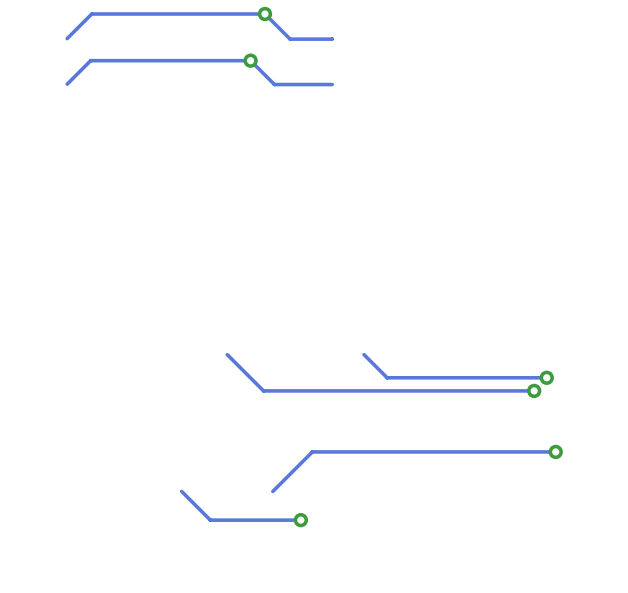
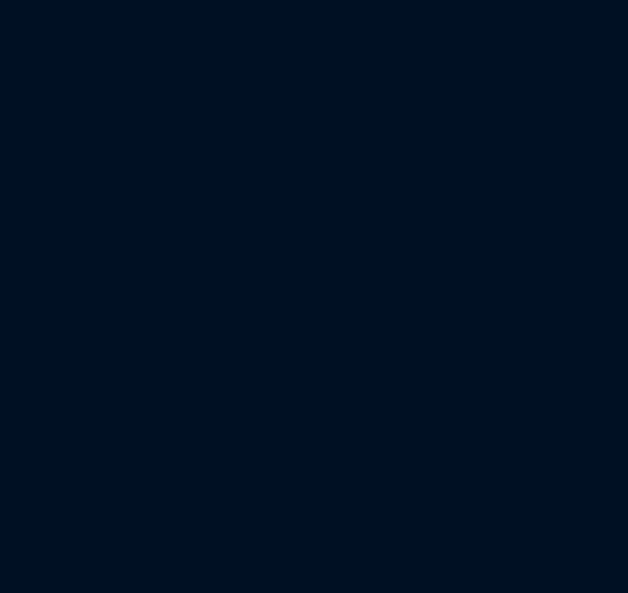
via: (264, 14) -> none
track: (67, 38) (91, 14) (264, 14) (290, 39) (332, 39) -> none
via: (250, 60) -> none
track: (67, 84) (90, 60) (250, 60) (274, 84) (332, 84) -> none
track: (227, 354) (263, 390) (534, 390) -> none
track: (364, 354) (387, 377) (546, 377) -> none
via: (546, 377) -> none
via: (534, 390) -> none
track: (555, 451) (312, 451) (272, 491) -> none
via: (555, 451) -> none
track: (181, 491) (210, 520) (300, 520) -> none
via: (300, 520) -> none

